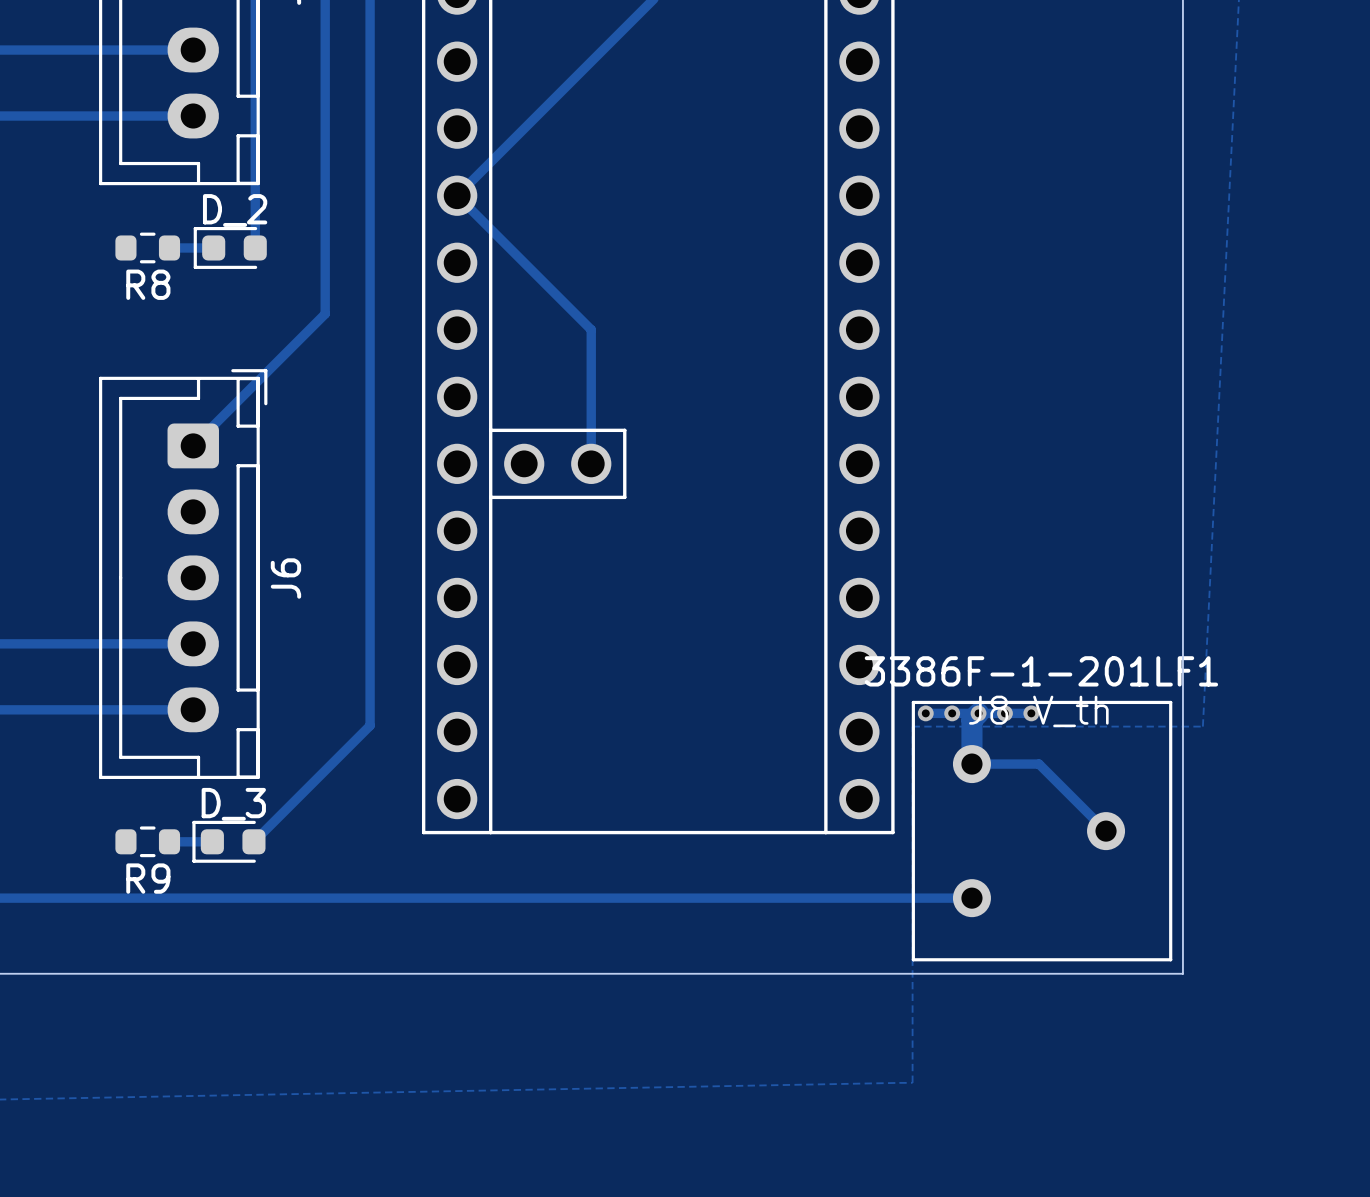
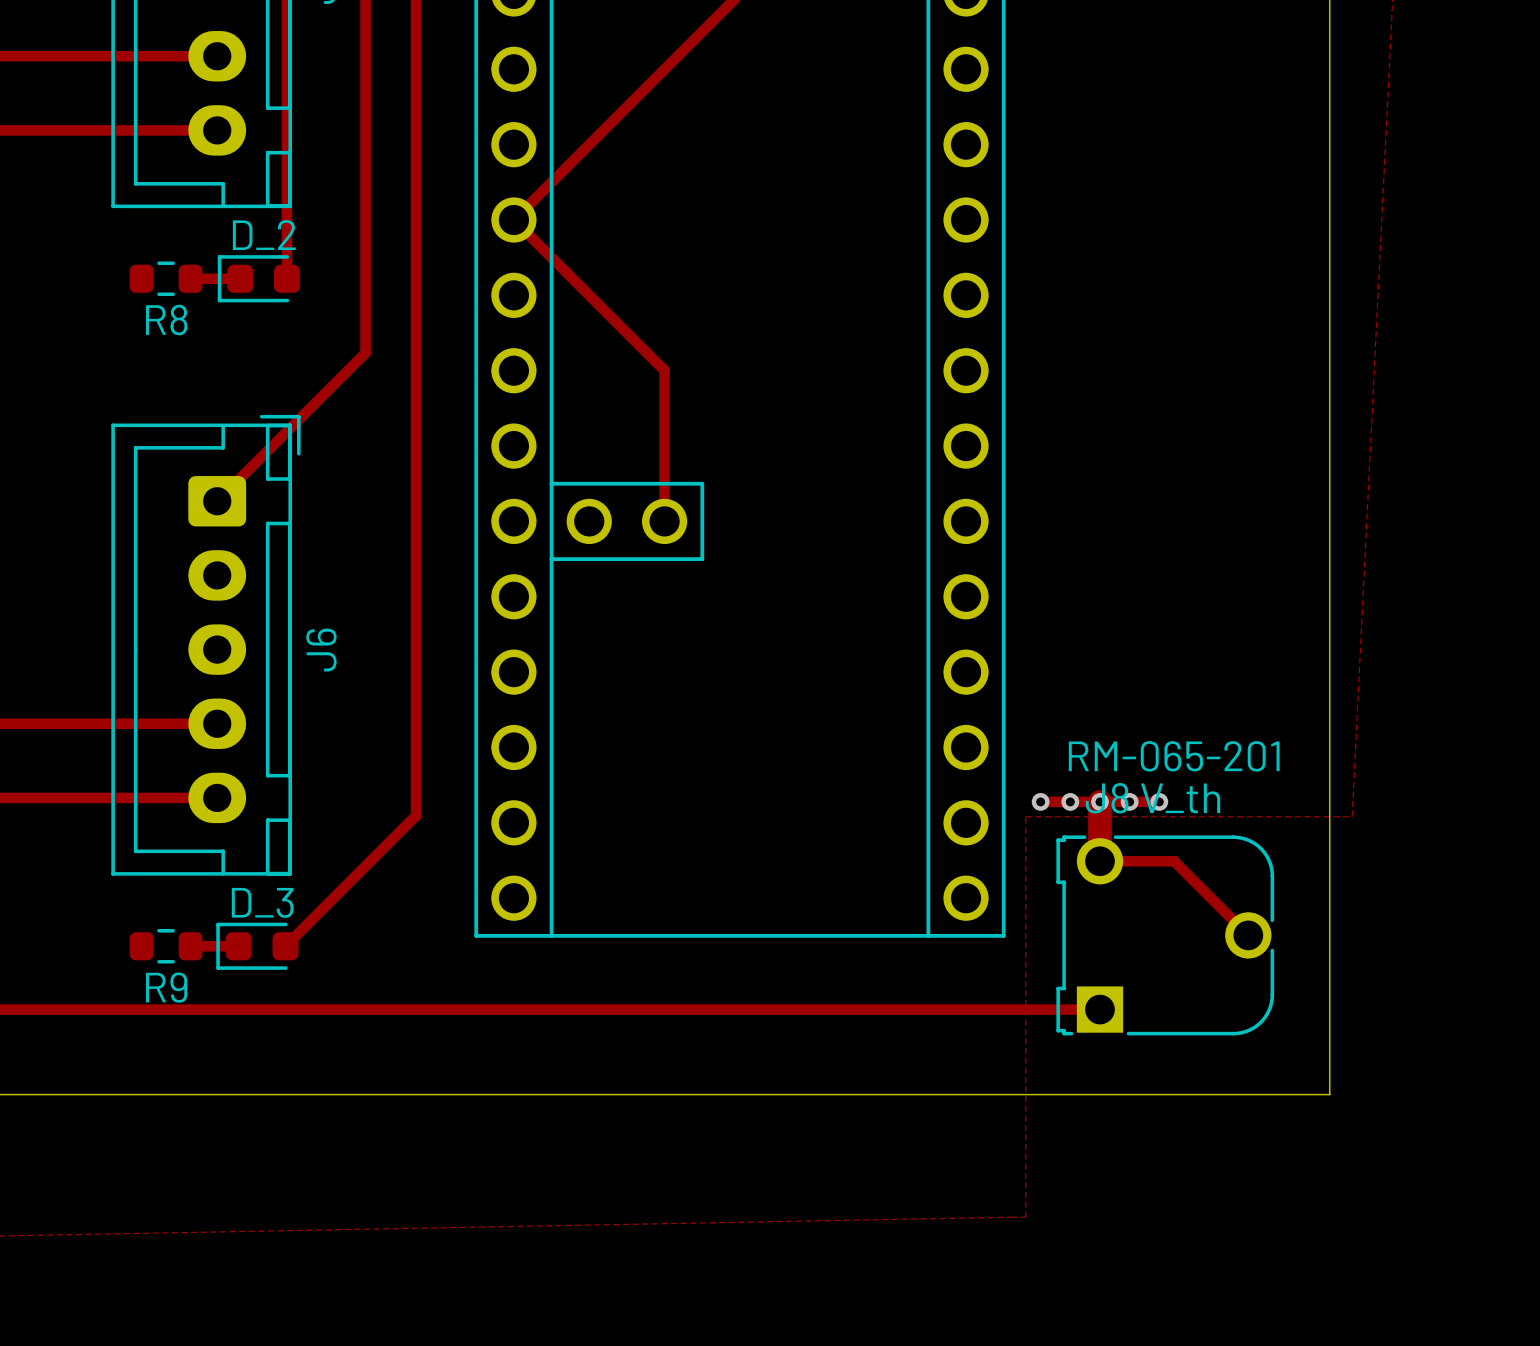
track: (978, 713) (971, 719) (971, 759) -> (1099, 801) (1099, 861) (1174, 861) (1248, 935)
track: (971, 764) (1039, 764) (1106, 831) -> none
3386F-1-201LF1: (1042, 831) -> none
RM-065-201: none -> (1165, 935)

